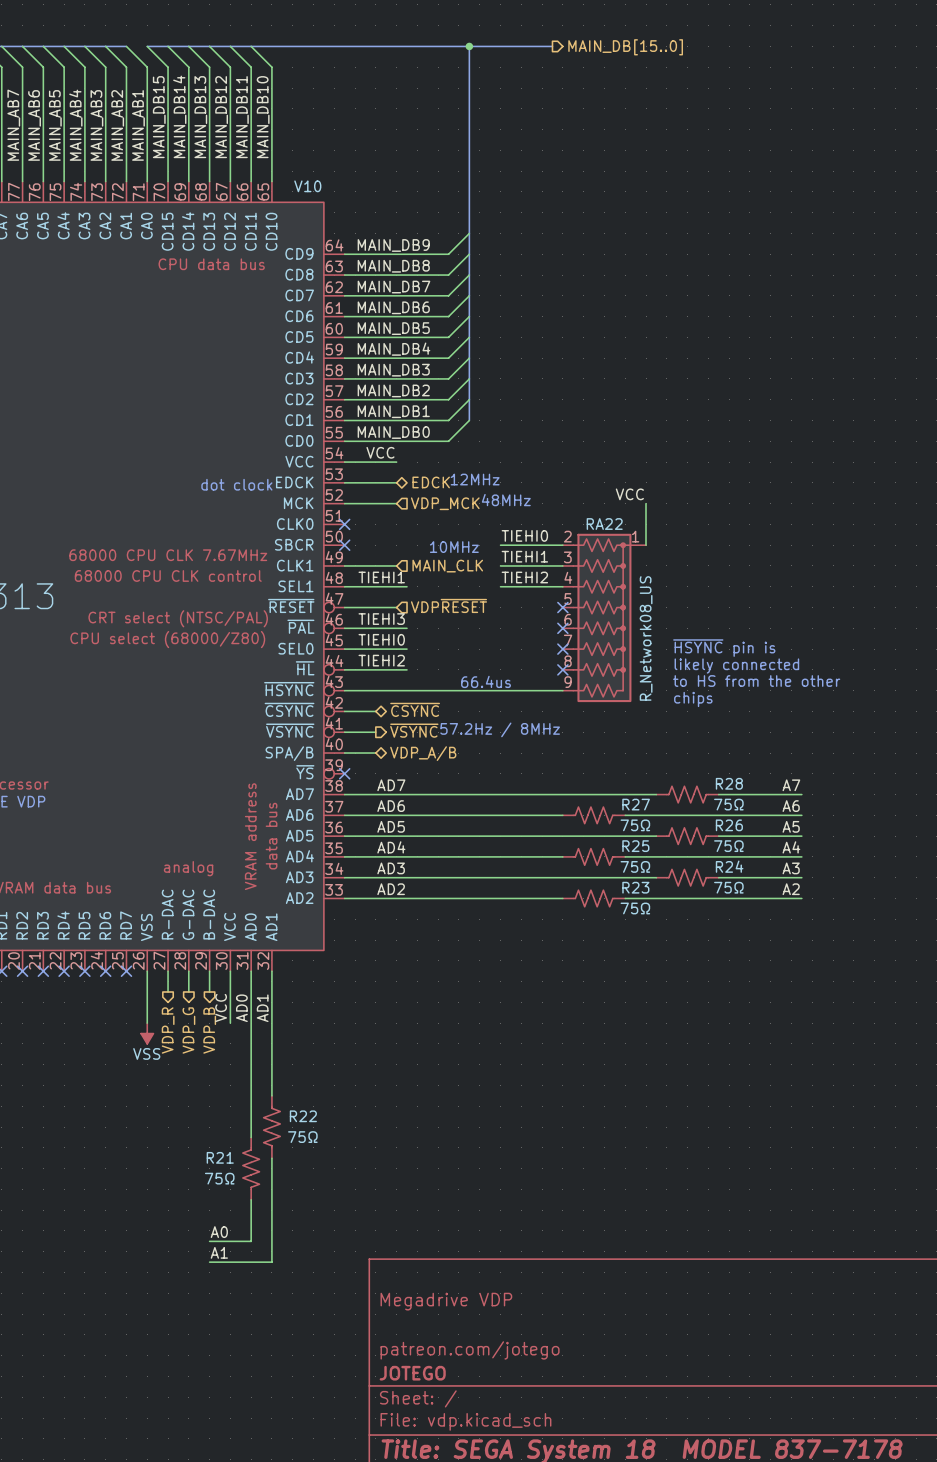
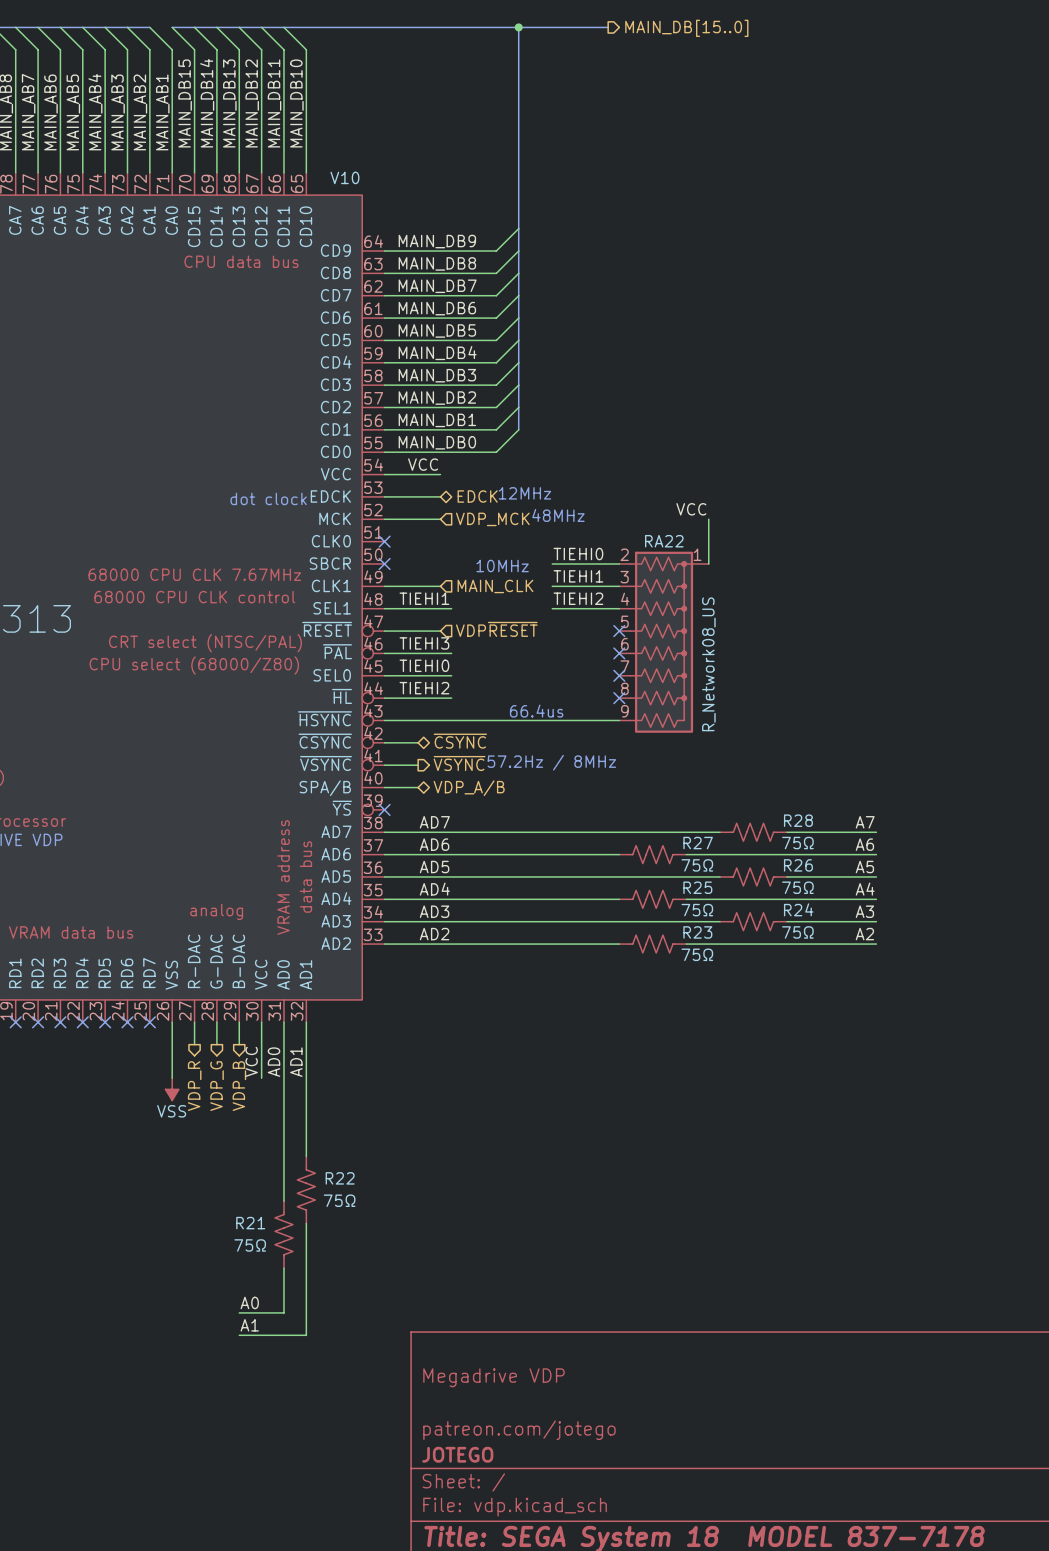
text: ~{HSYNC} pin is (724, 648) -> none
text: likely connected (736, 666) -> none
text: to HS from the other (756, 681) -> none
text: chips (693, 699) -> none

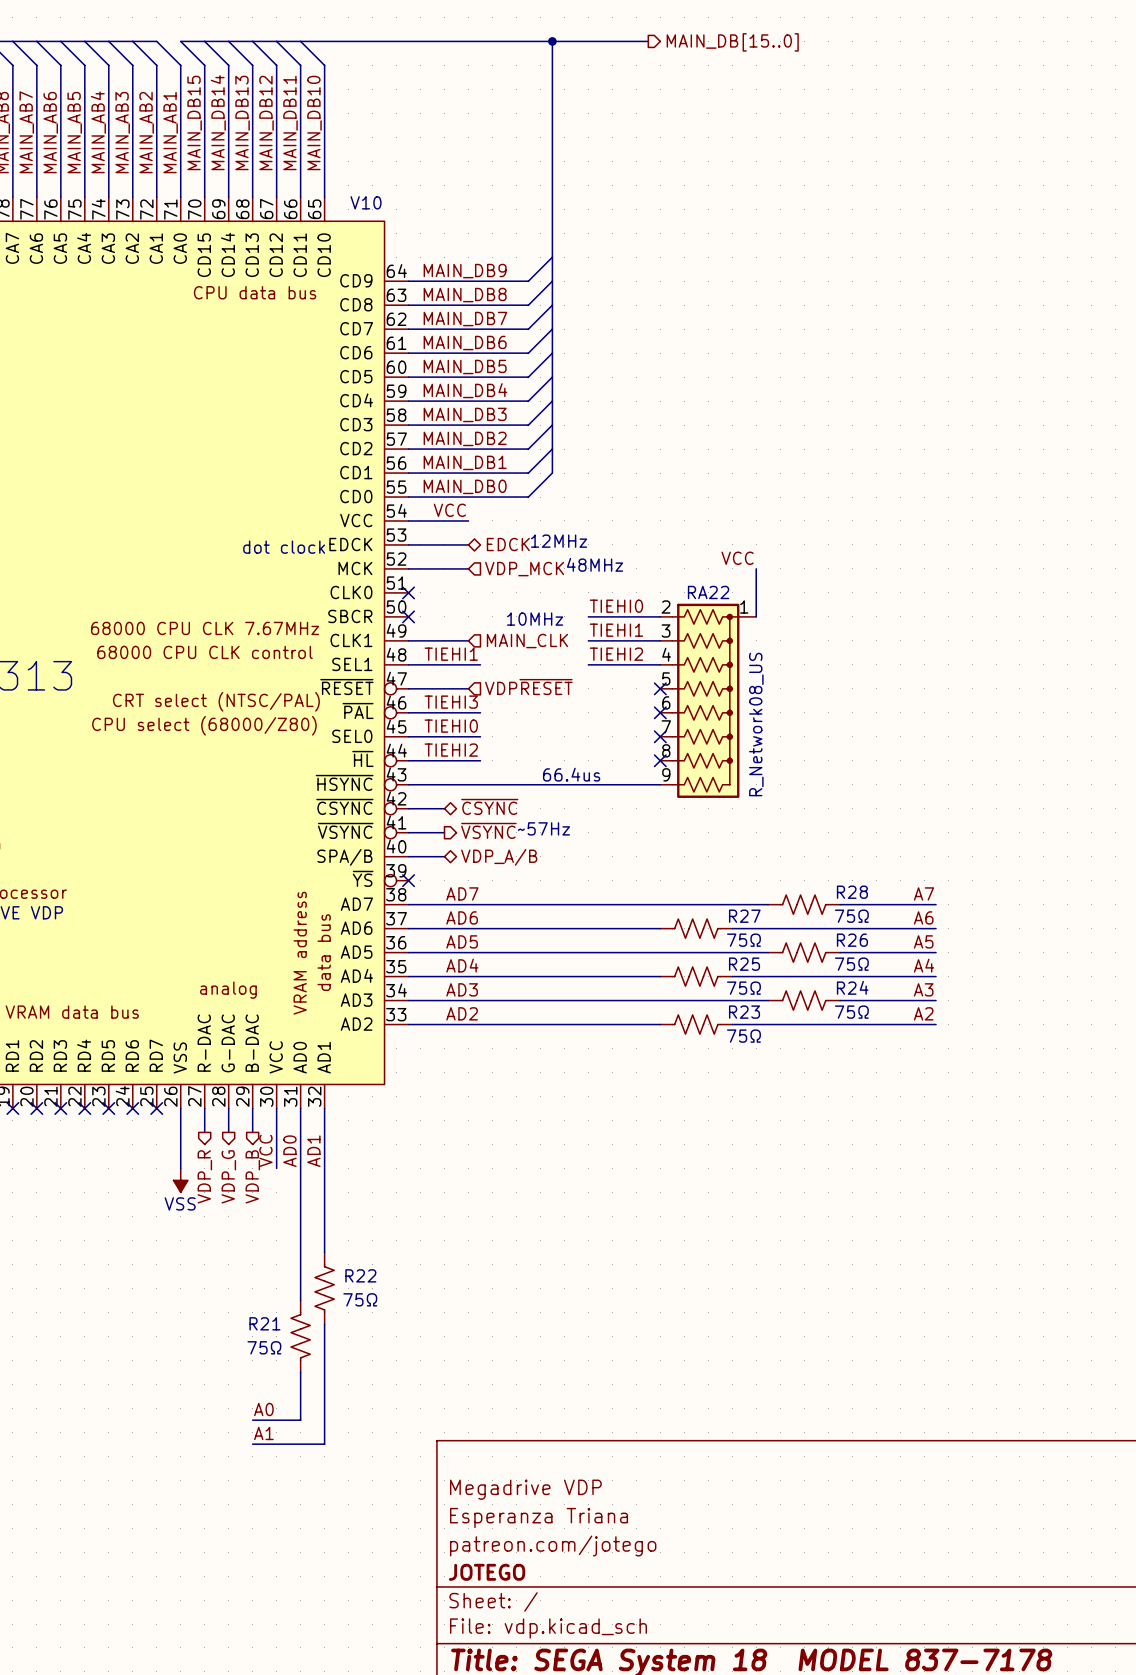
text: 57.2Hz / 8MHz (551, 762) -> ~57Hz (543, 828)
title block: none -> Esperanza Triana (539, 1518)

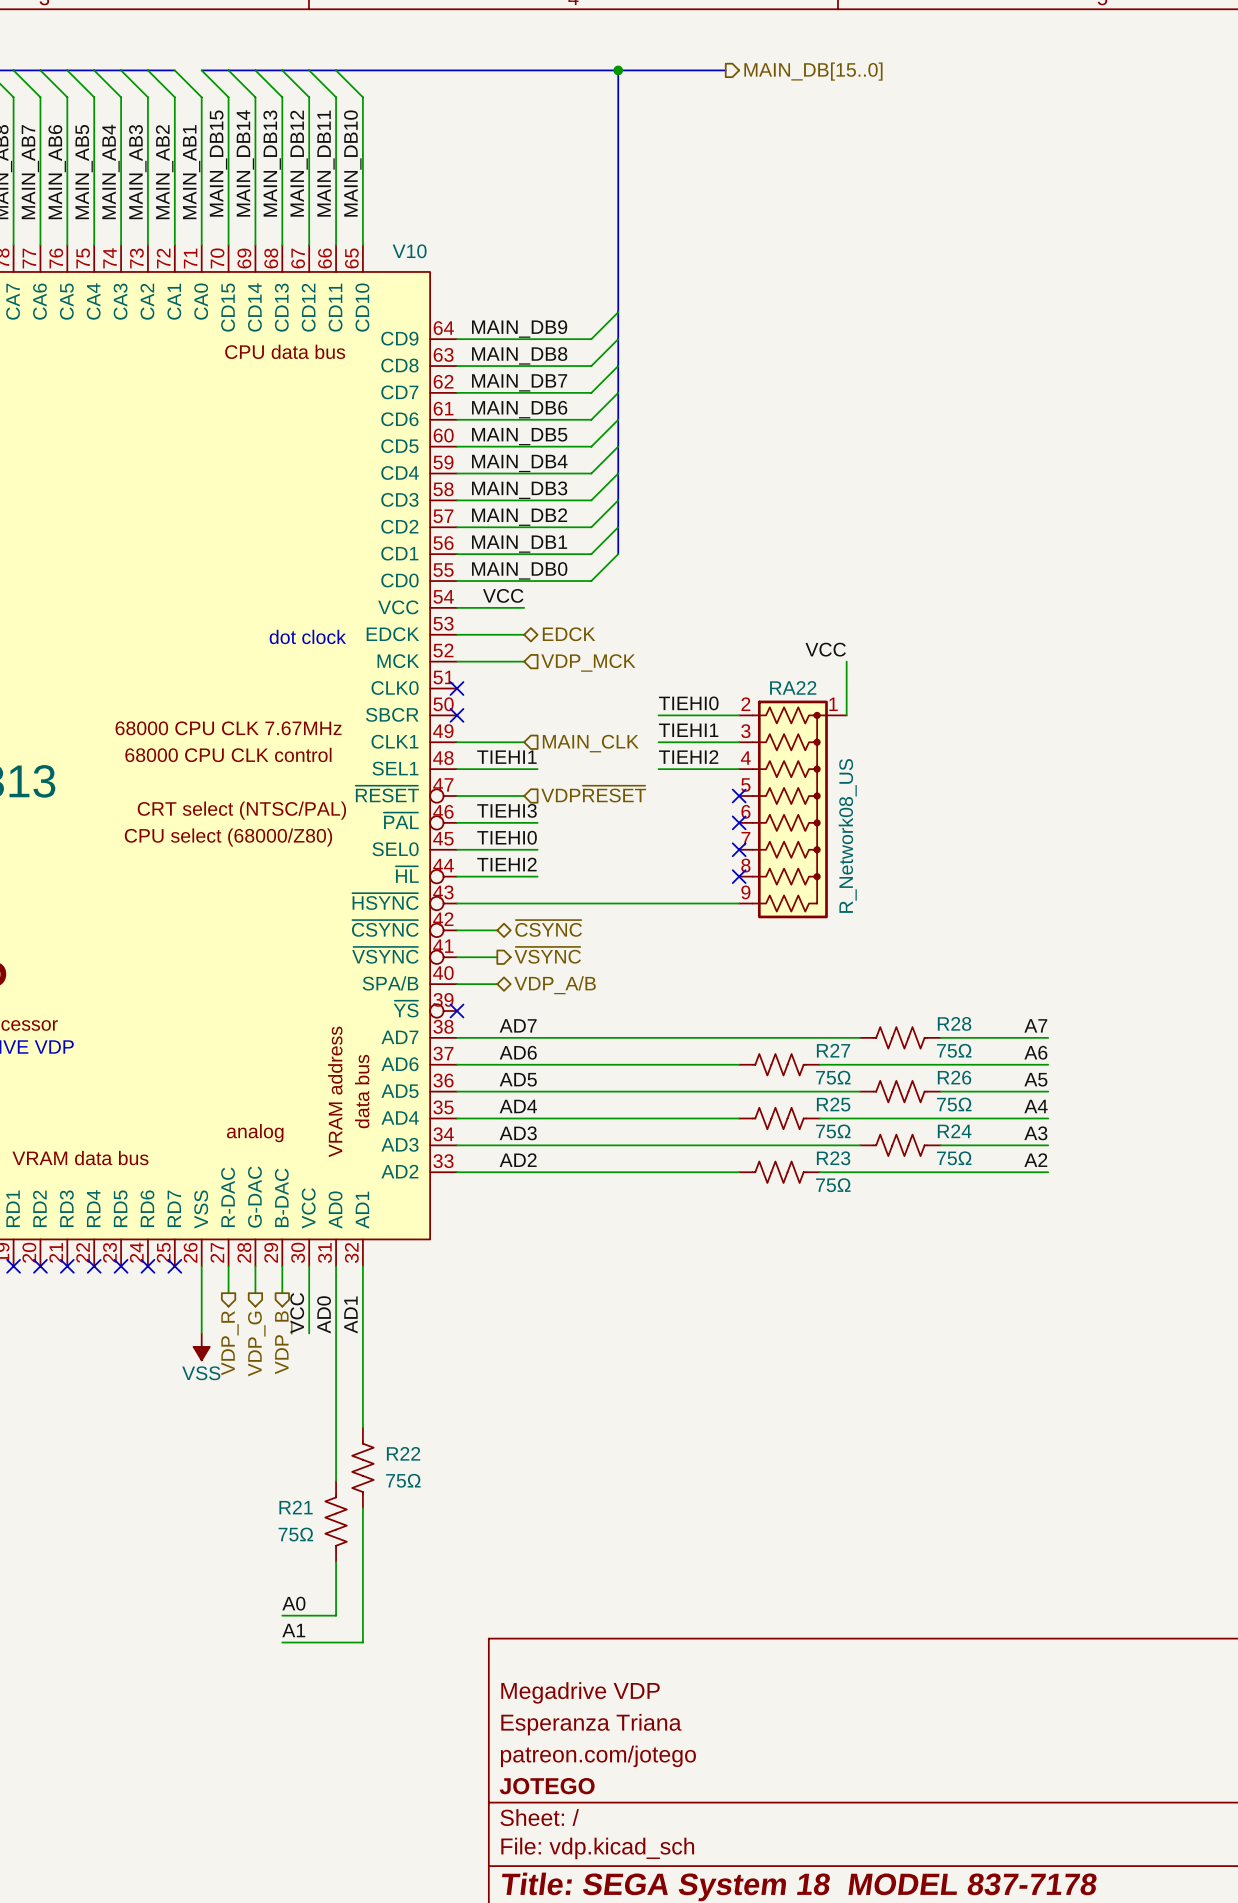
text: 12MHz (559, 541) -> none
text: 48MHz (595, 564) -> none
text: 10MHz (535, 619) -> none
text: 66.4us (571, 774) -> none
text: ~57Hz (543, 828) -> none

